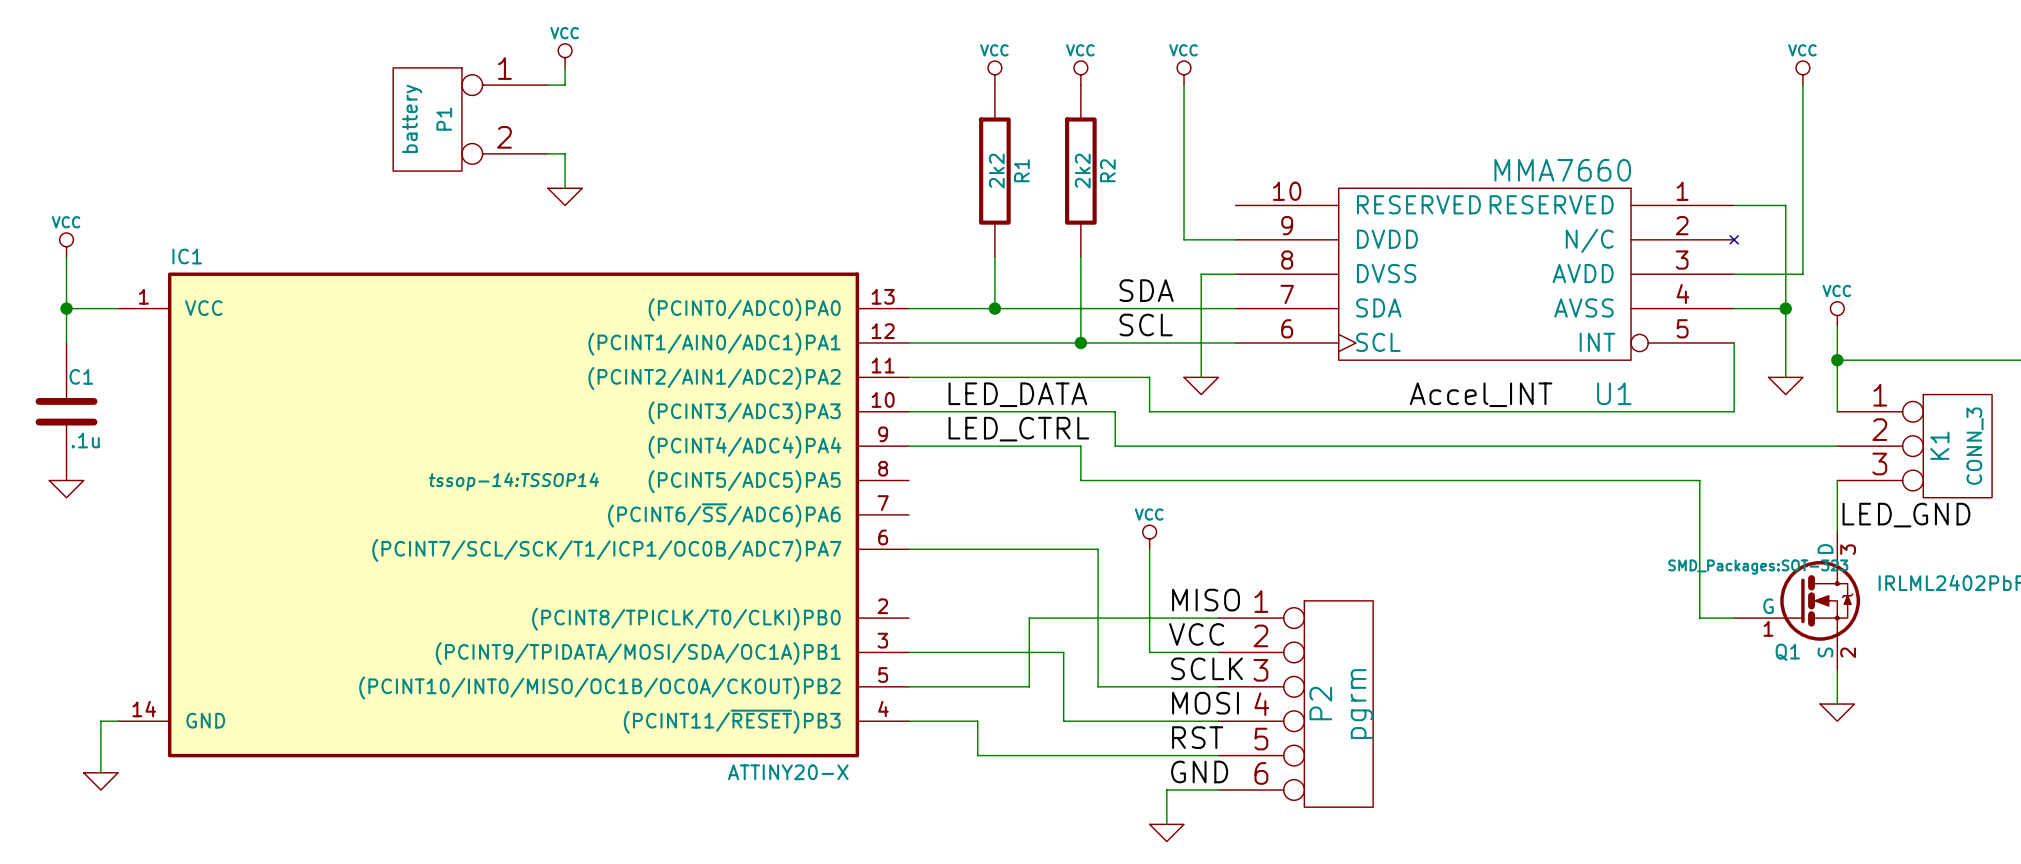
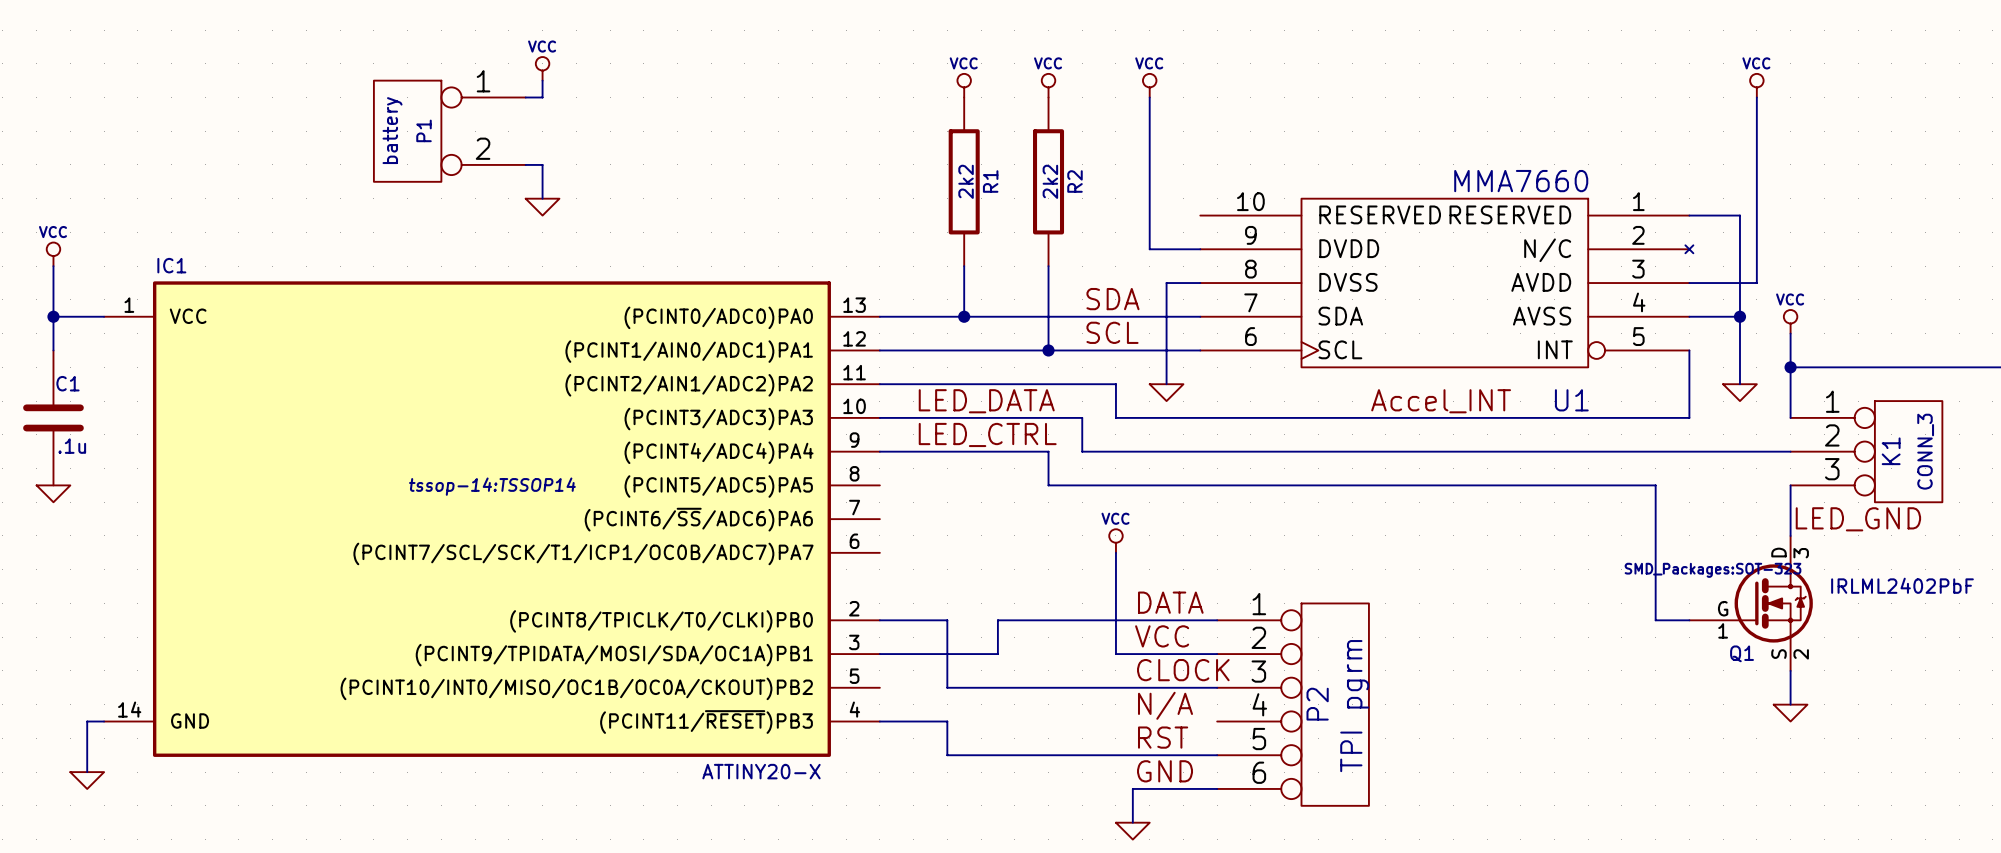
wire: (908, 549) (1098, 549) (1098, 686) -> none
label: MISO (1206, 600) -> DATA (1170, 602)
label: SCLK (1206, 668) -> CLOCK (1183, 670)
wire: (908, 686) (977, 686) -> (879, 620) (947, 620) (947, 687)
wire: (1029, 686) (1029, 652) (1063, 652) (1063, 721) (1218, 721) -> (997, 687) (1065, 687)
label: MOSI (1205, 703) -> N/A (1165, 705)
P2 position: (1295, 704) -> (1293, 704)
P2 value: pgrm (1362, 704) -> TPI pgrm (1354, 706)

